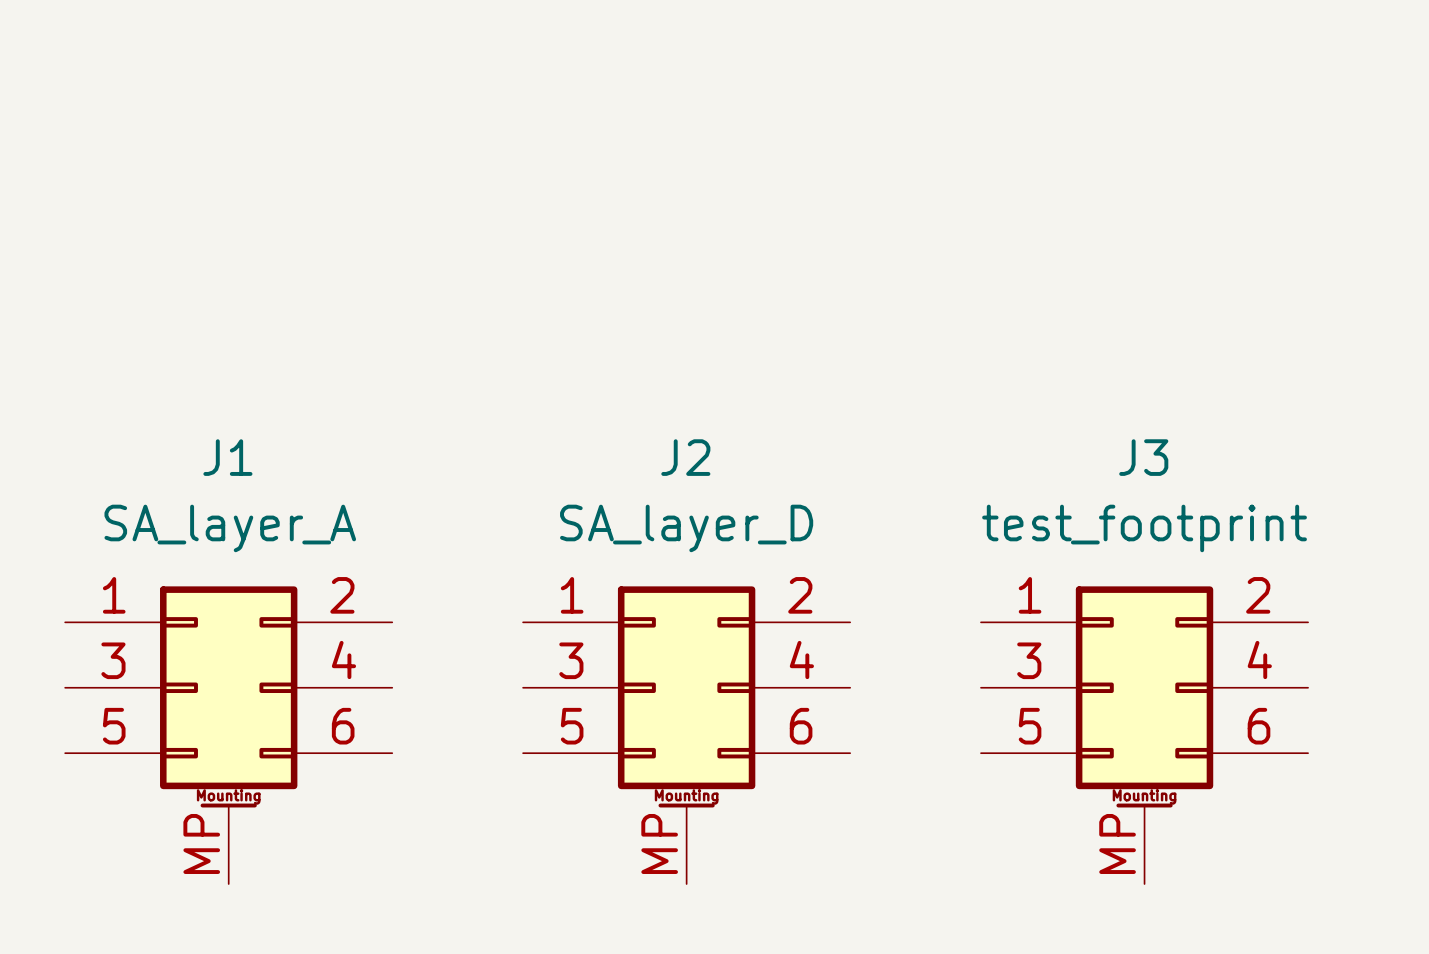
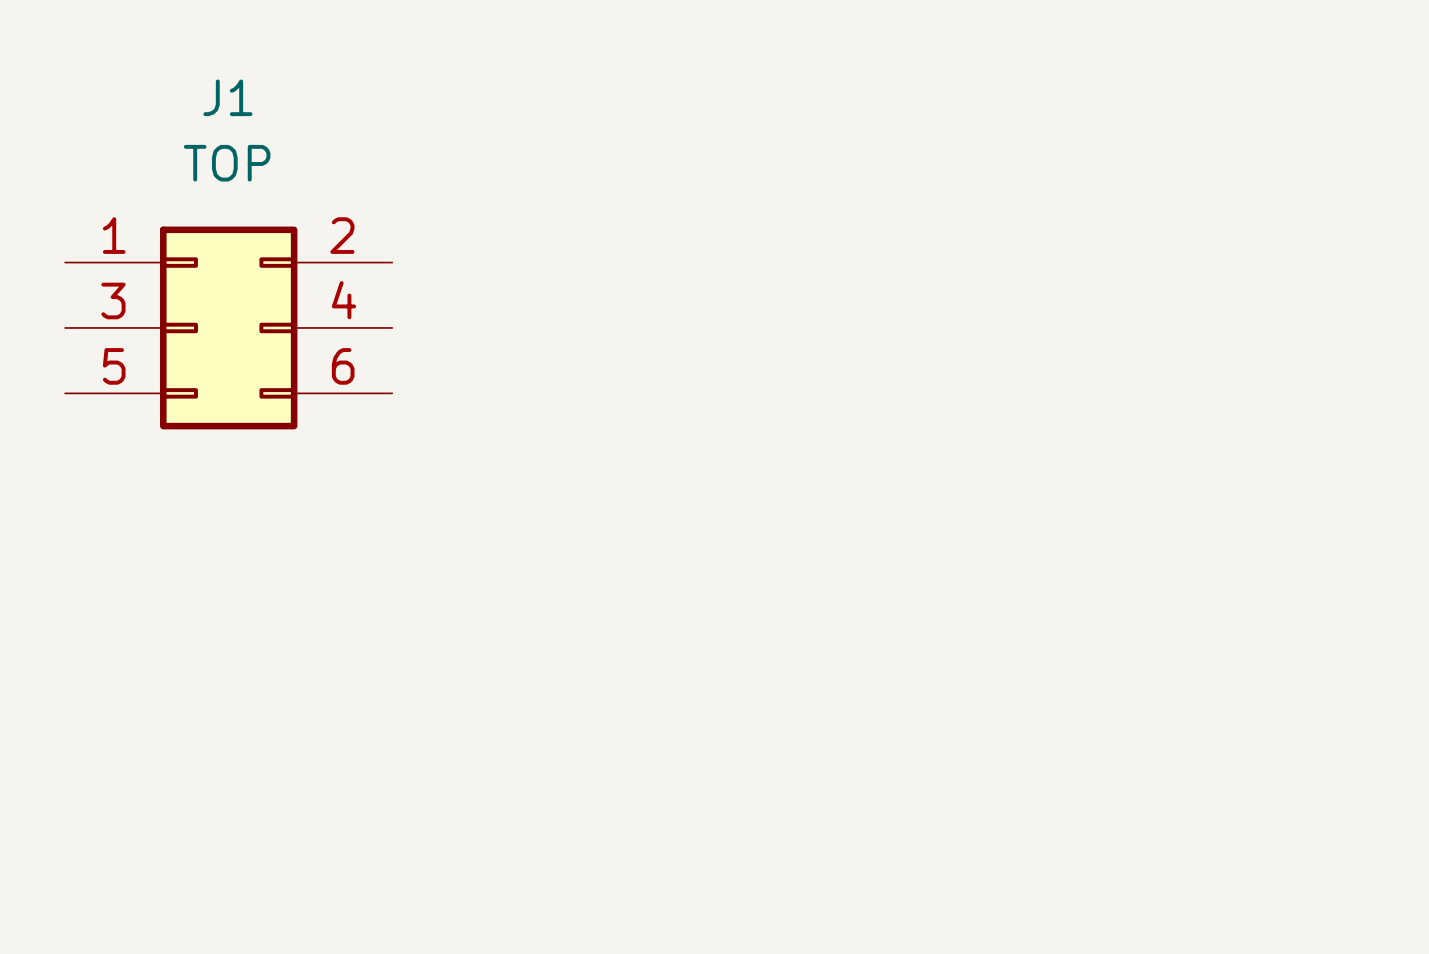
J1 value: SA_layer_A (230, 528) -> TOP (227, 163)
J1 symbol: [65, 586, 393, 885] -> [65, 226, 393, 430]
J2: SA_layer_D (686, 735) -> none
J3: test_footprint (1144, 735) -> none

